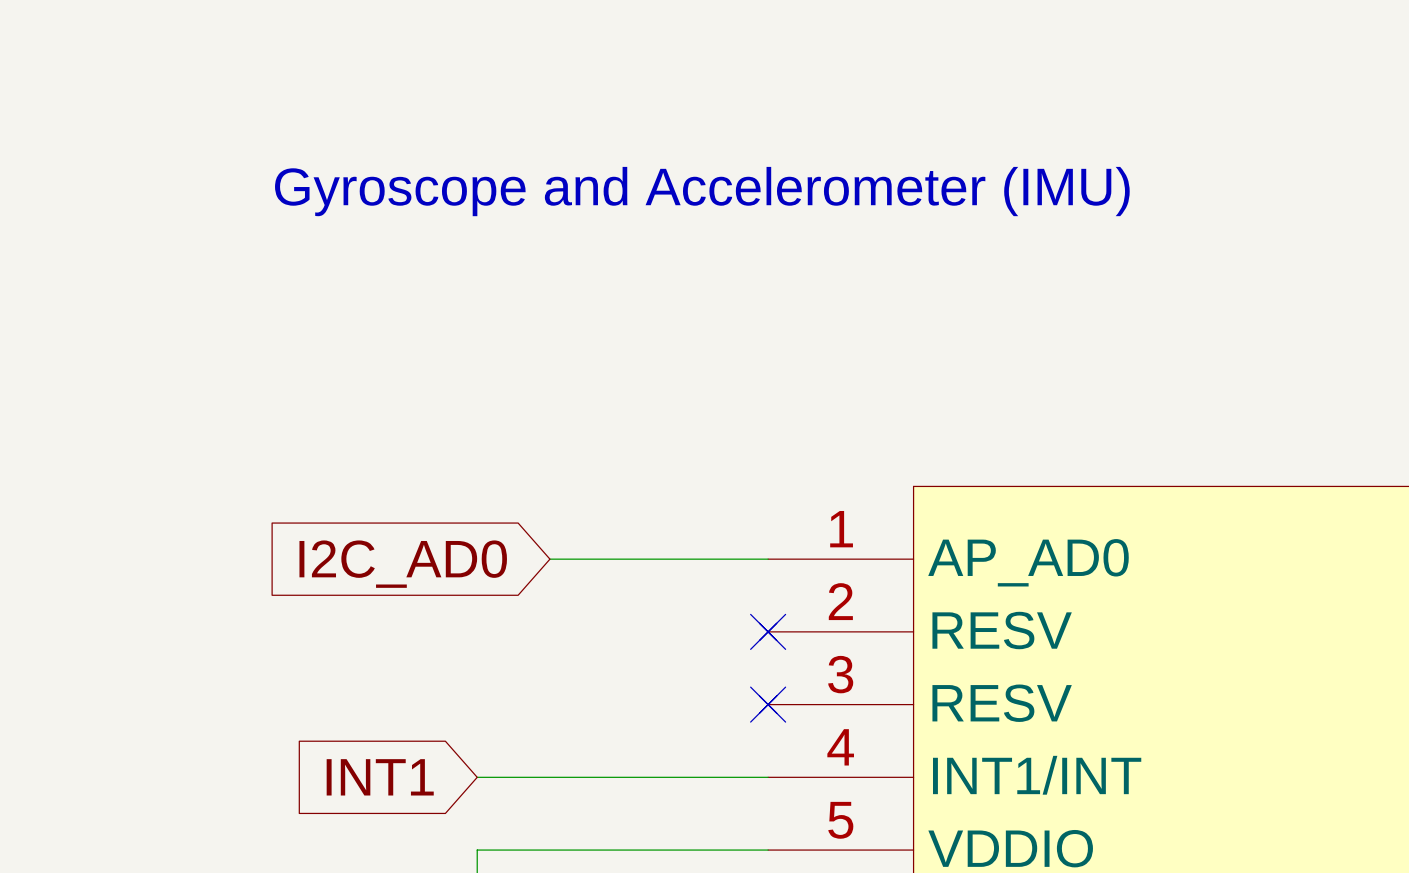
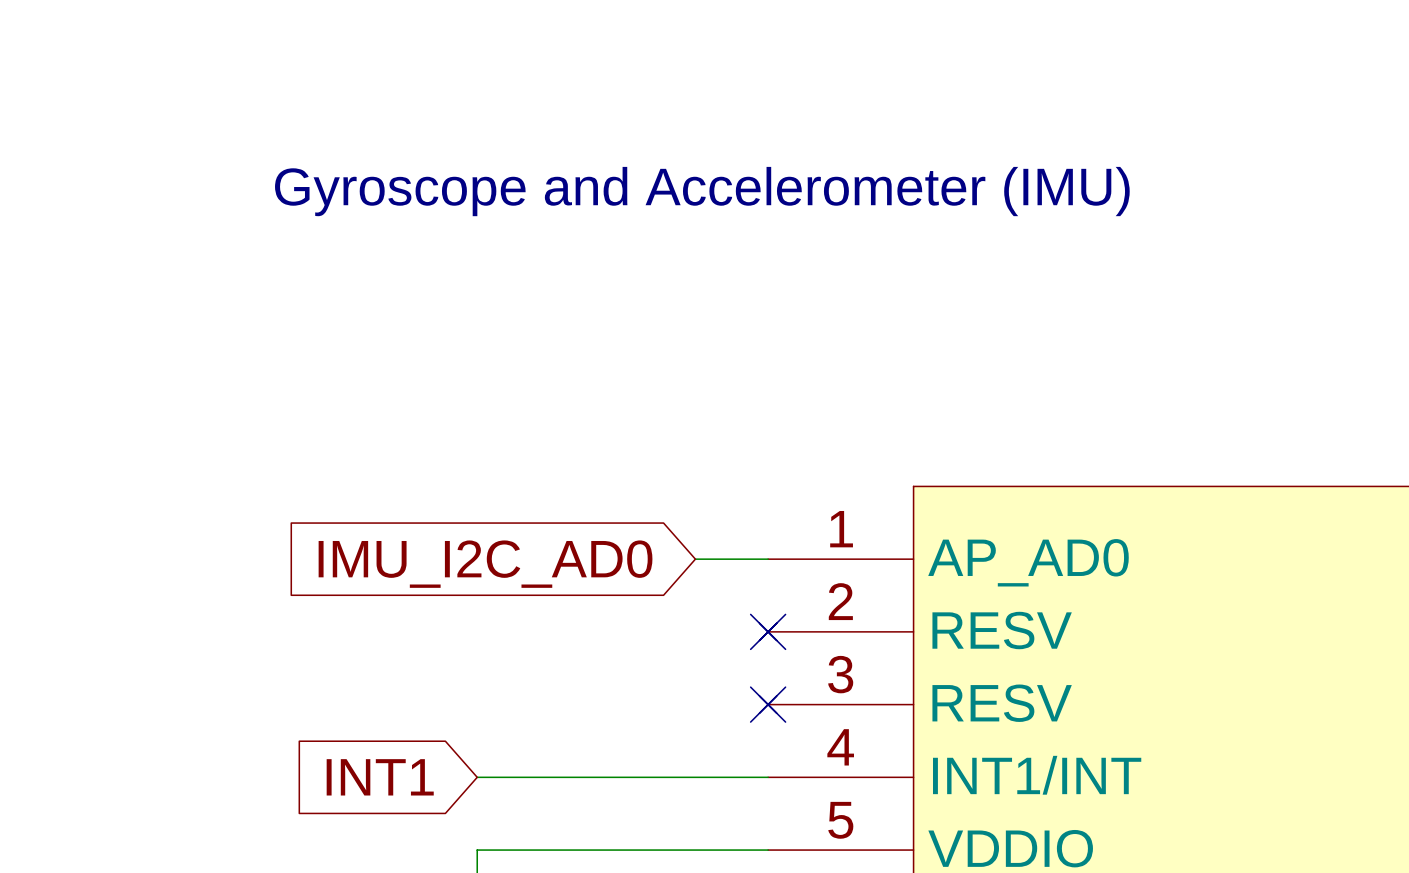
wire: (549, 559) (695, 559) -> none
global label: I2C_AD0 (403, 564) -> IMU_I2C_AD0 (485, 564)

